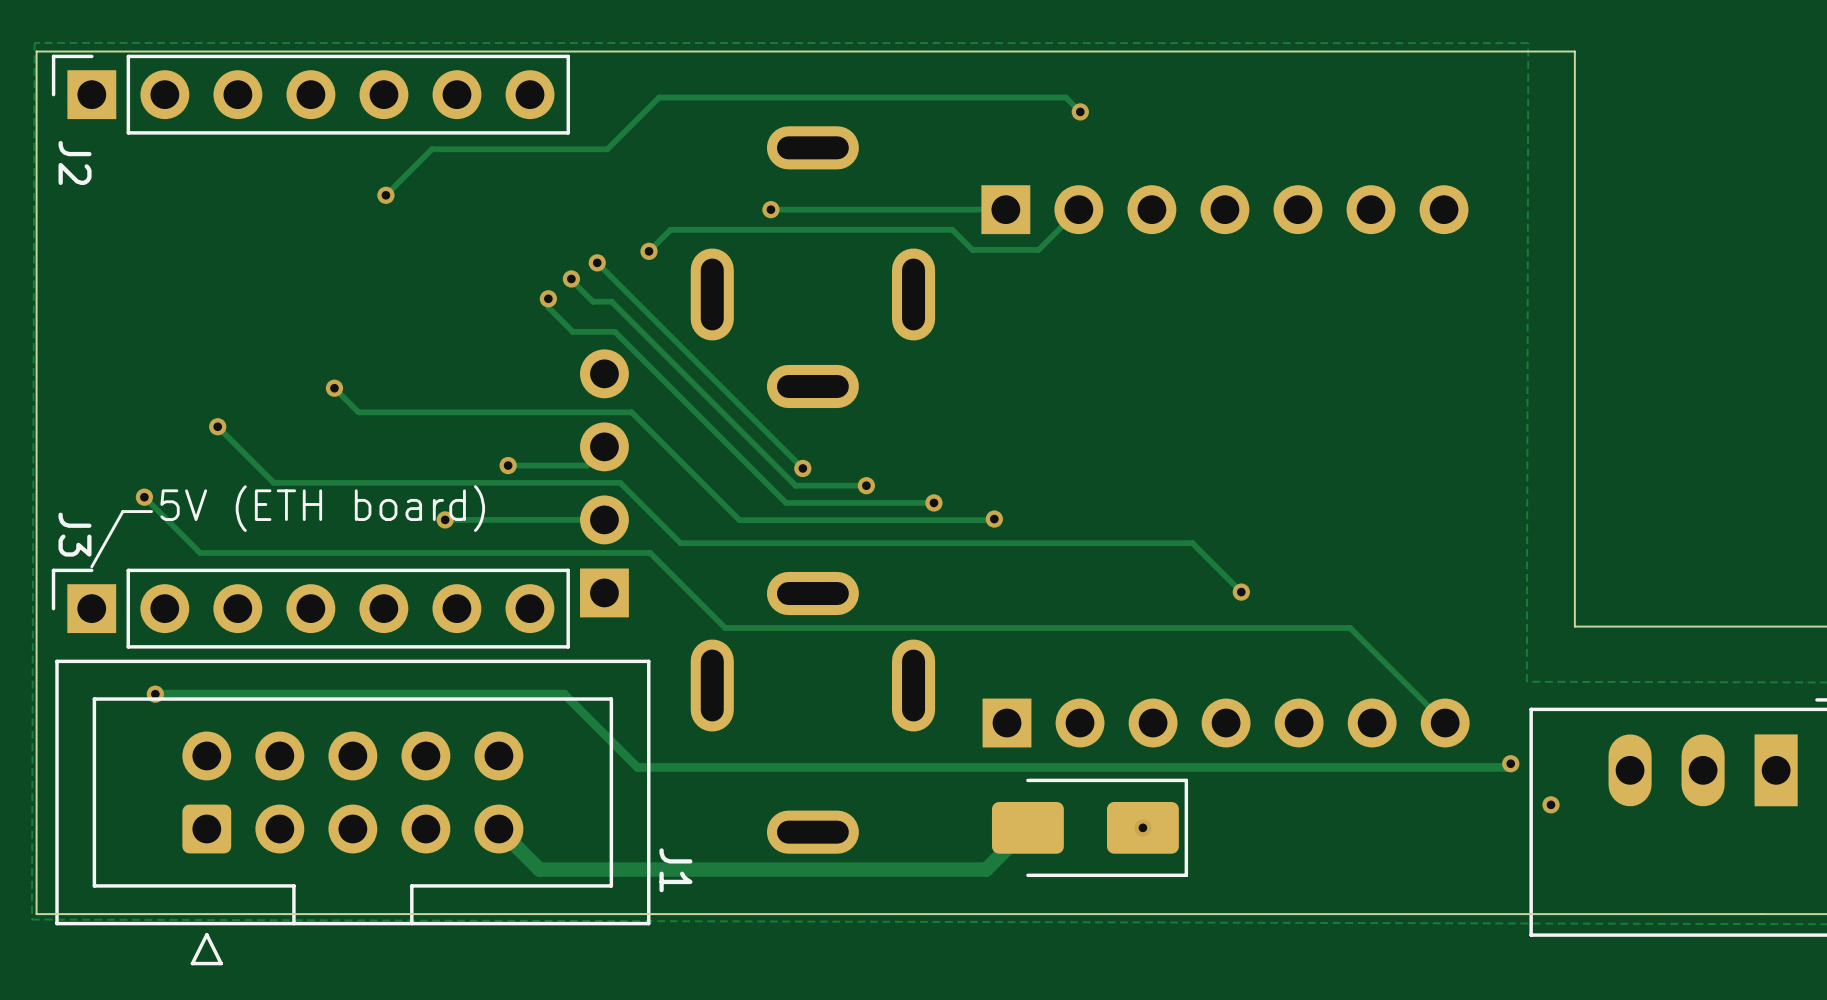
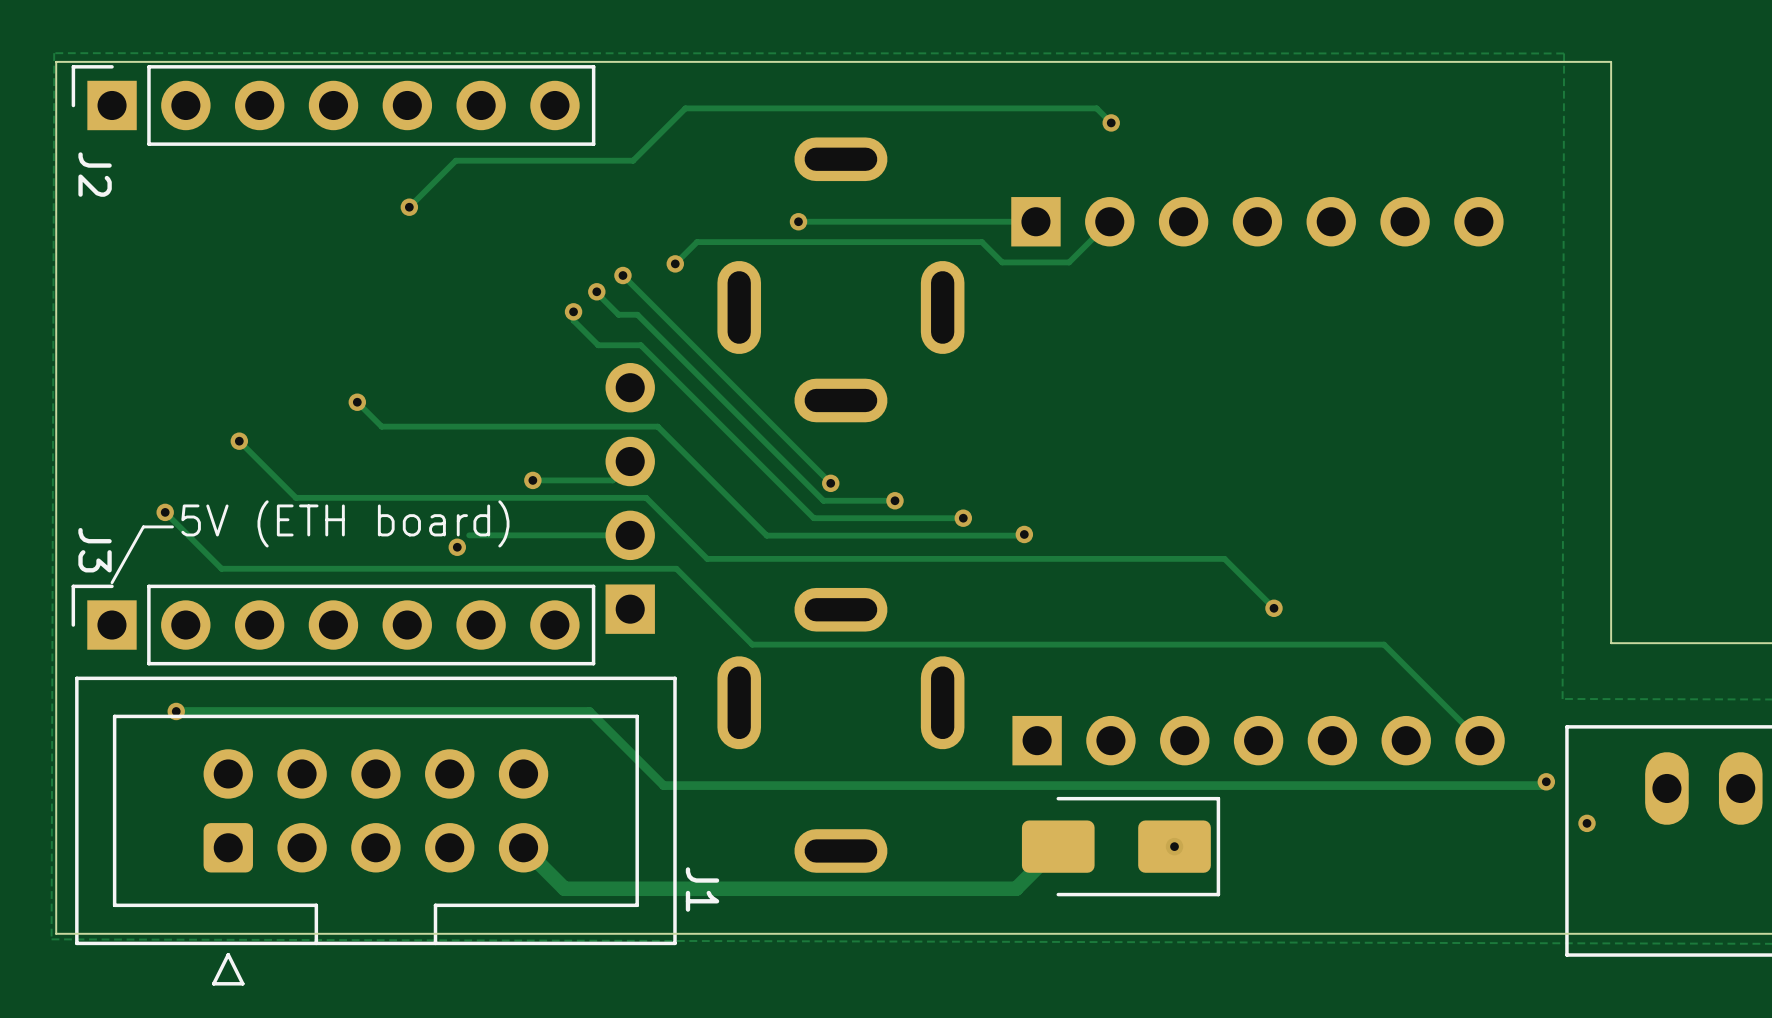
via position: (445, 519) -> (457, 547)

